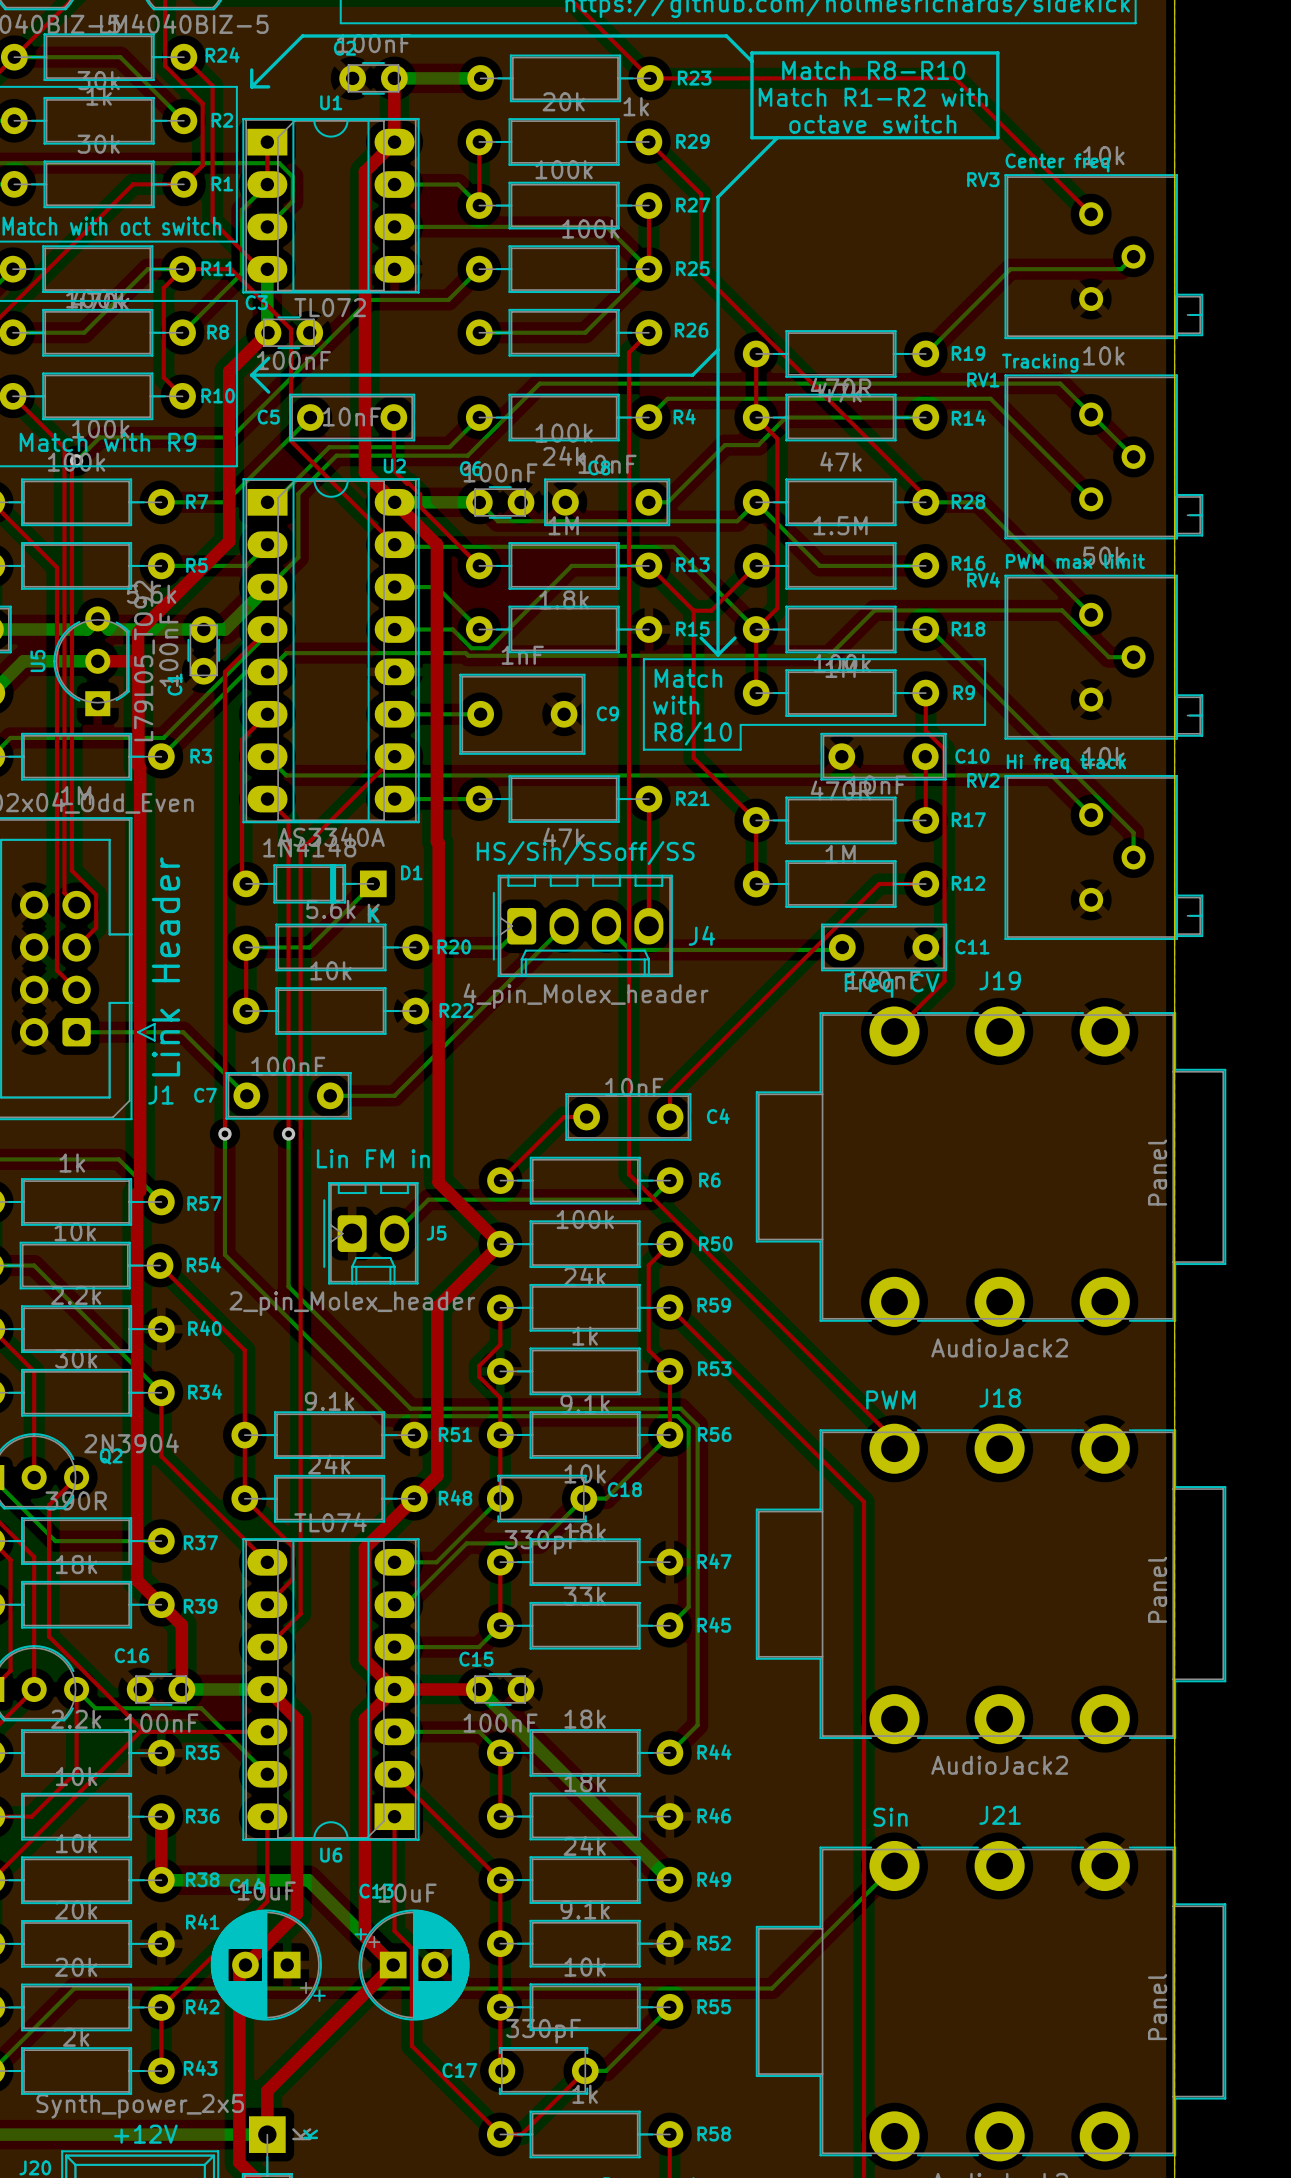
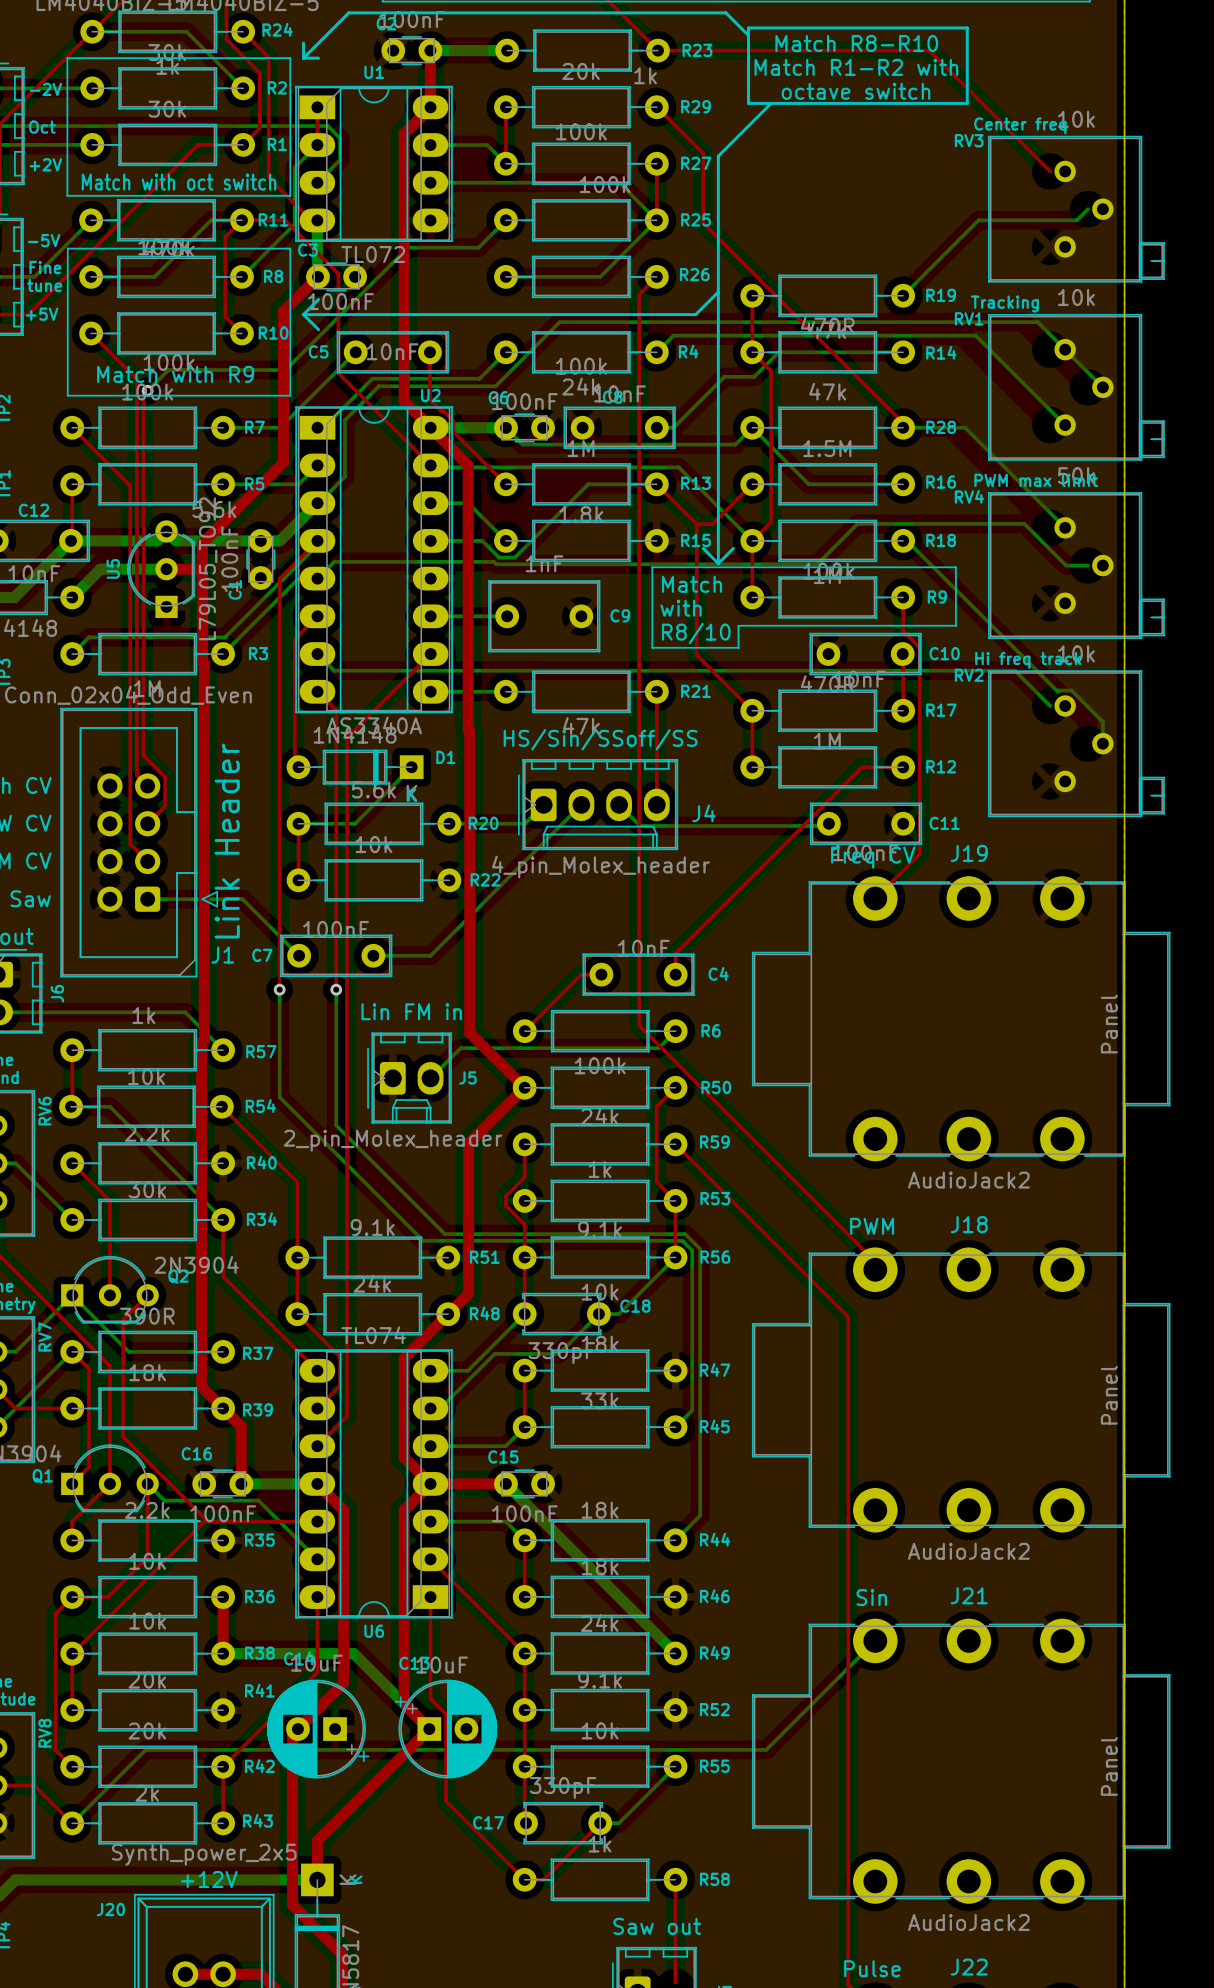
RV3 position: (1103, 256) -> (1076, 209)
bottom track: (1060, 383) (1133, 456) -> (1022, 322) (1037, 322) (1102, 387)
bottom track: (990, 398) (1091, 499) -> (960, 335) (975, 335) (1065, 425)
RV1 position: (1103, 456) -> (1076, 387)
bottom track: (978, 502) (1091, 614) -> (950, 427) (965, 427) (1065, 527)
RV4 position: (1103, 657) -> (1076, 565)
bottom track: (1099, 798) (1133, 832) (1133, 857) -> (1057, 691) (1071, 690) (1102, 721) (1102, 743)
RV2 position: (1103, 857) -> (1076, 743)

